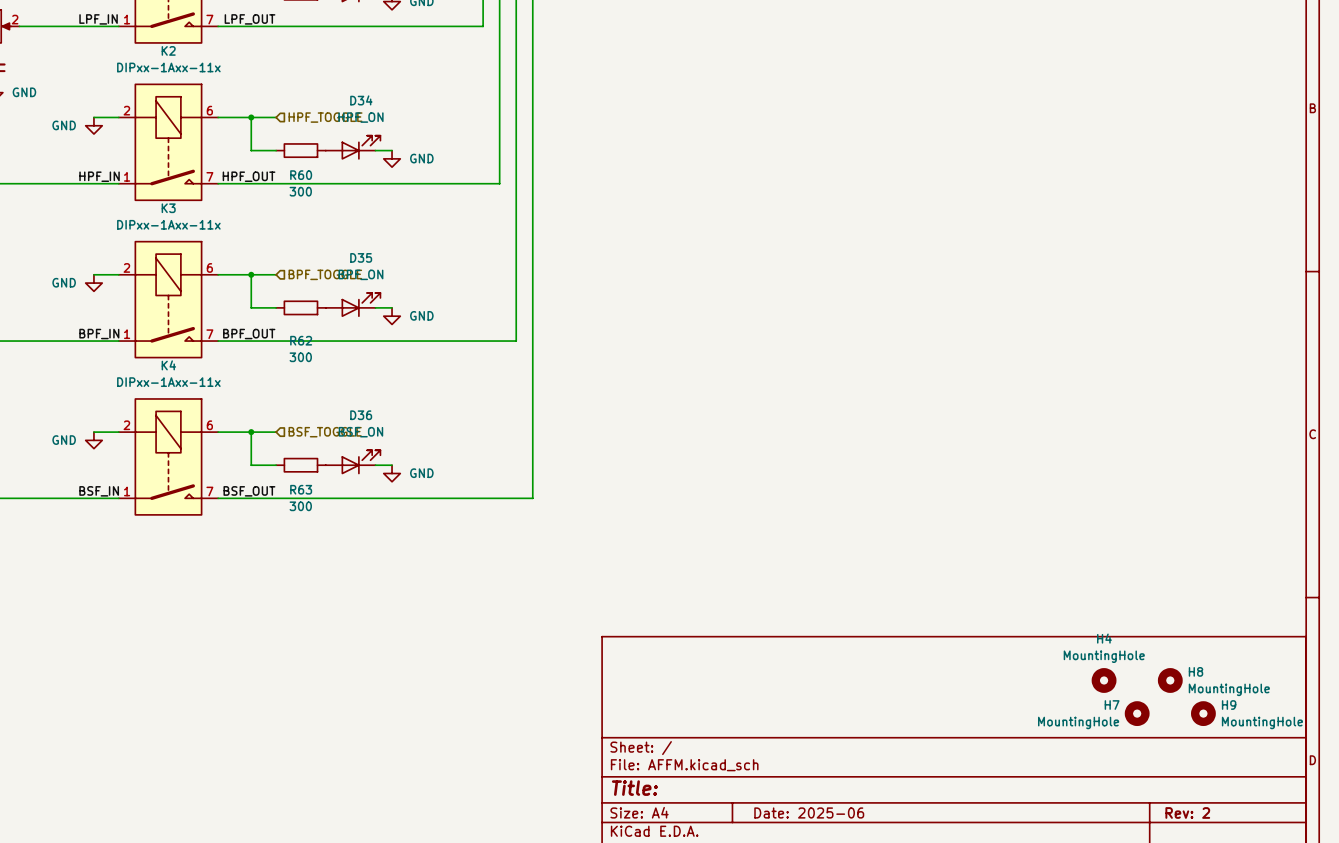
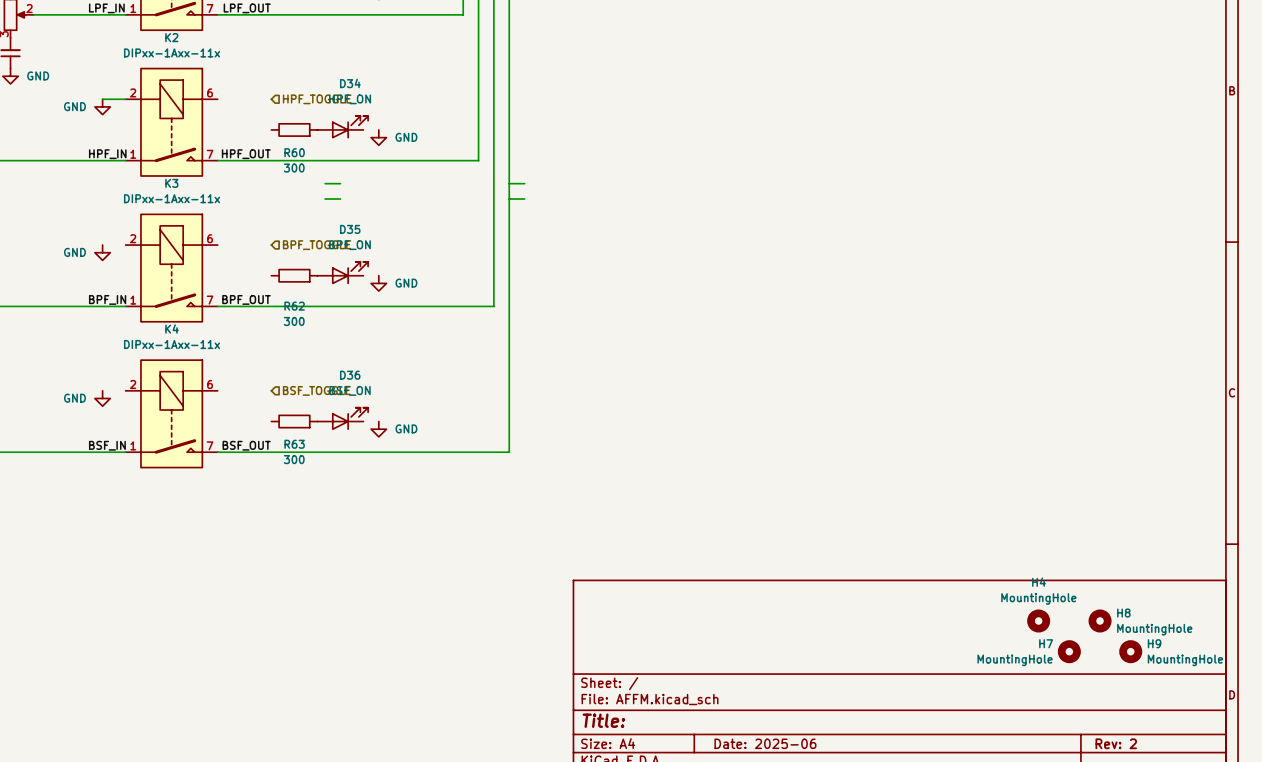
wire: (218, 117) (276, 117) -> none
wire: (251, 117) (251, 150) (276, 150) -> none
junction: (251, 117) -> none
wire: (375, 150) (392, 150) -> (325, 183) (340, 183)
wire: none -> (509, 183) (524, 183)
wire: none -> (509, 199) (524, 199)
wire: (93, 274) (118, 274) -> none
wire: (218, 274) (276, 274) -> none
wire: (251, 274) (251, 307) (276, 307) -> none
junction: (251, 274) -> none
wire: (375, 307) (392, 307) -> (325, 199) (340, 199)
wire: (93, 432) (118, 432) -> none
wire: (218, 432) (276, 432) -> none
wire: (251, 432) (251, 465) (276, 465) -> none
junction: (251, 432) -> none
wire: (375, 465) (392, 465) -> none

